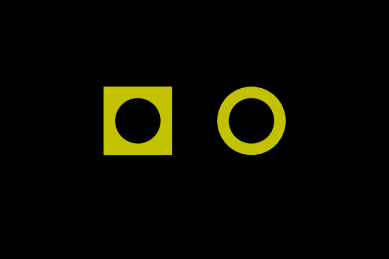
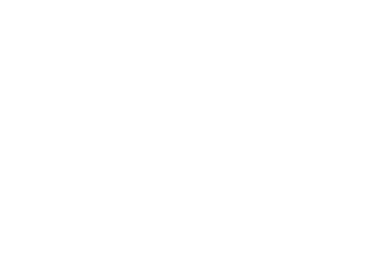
part: (194, 120) -> none

